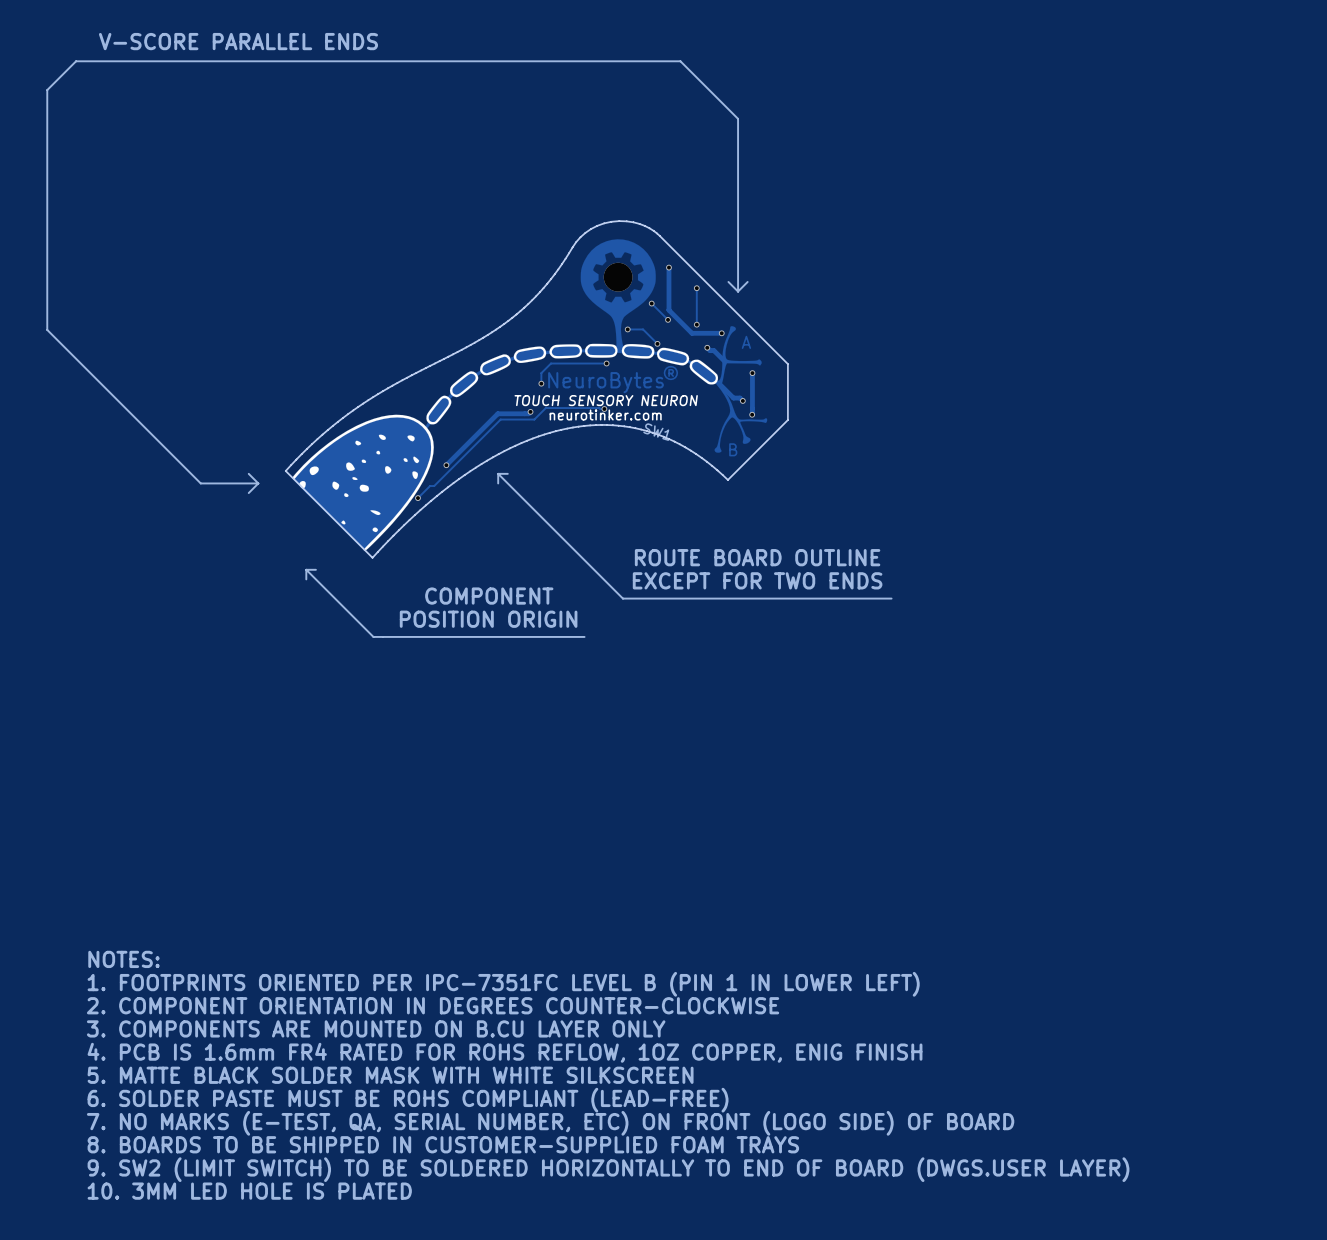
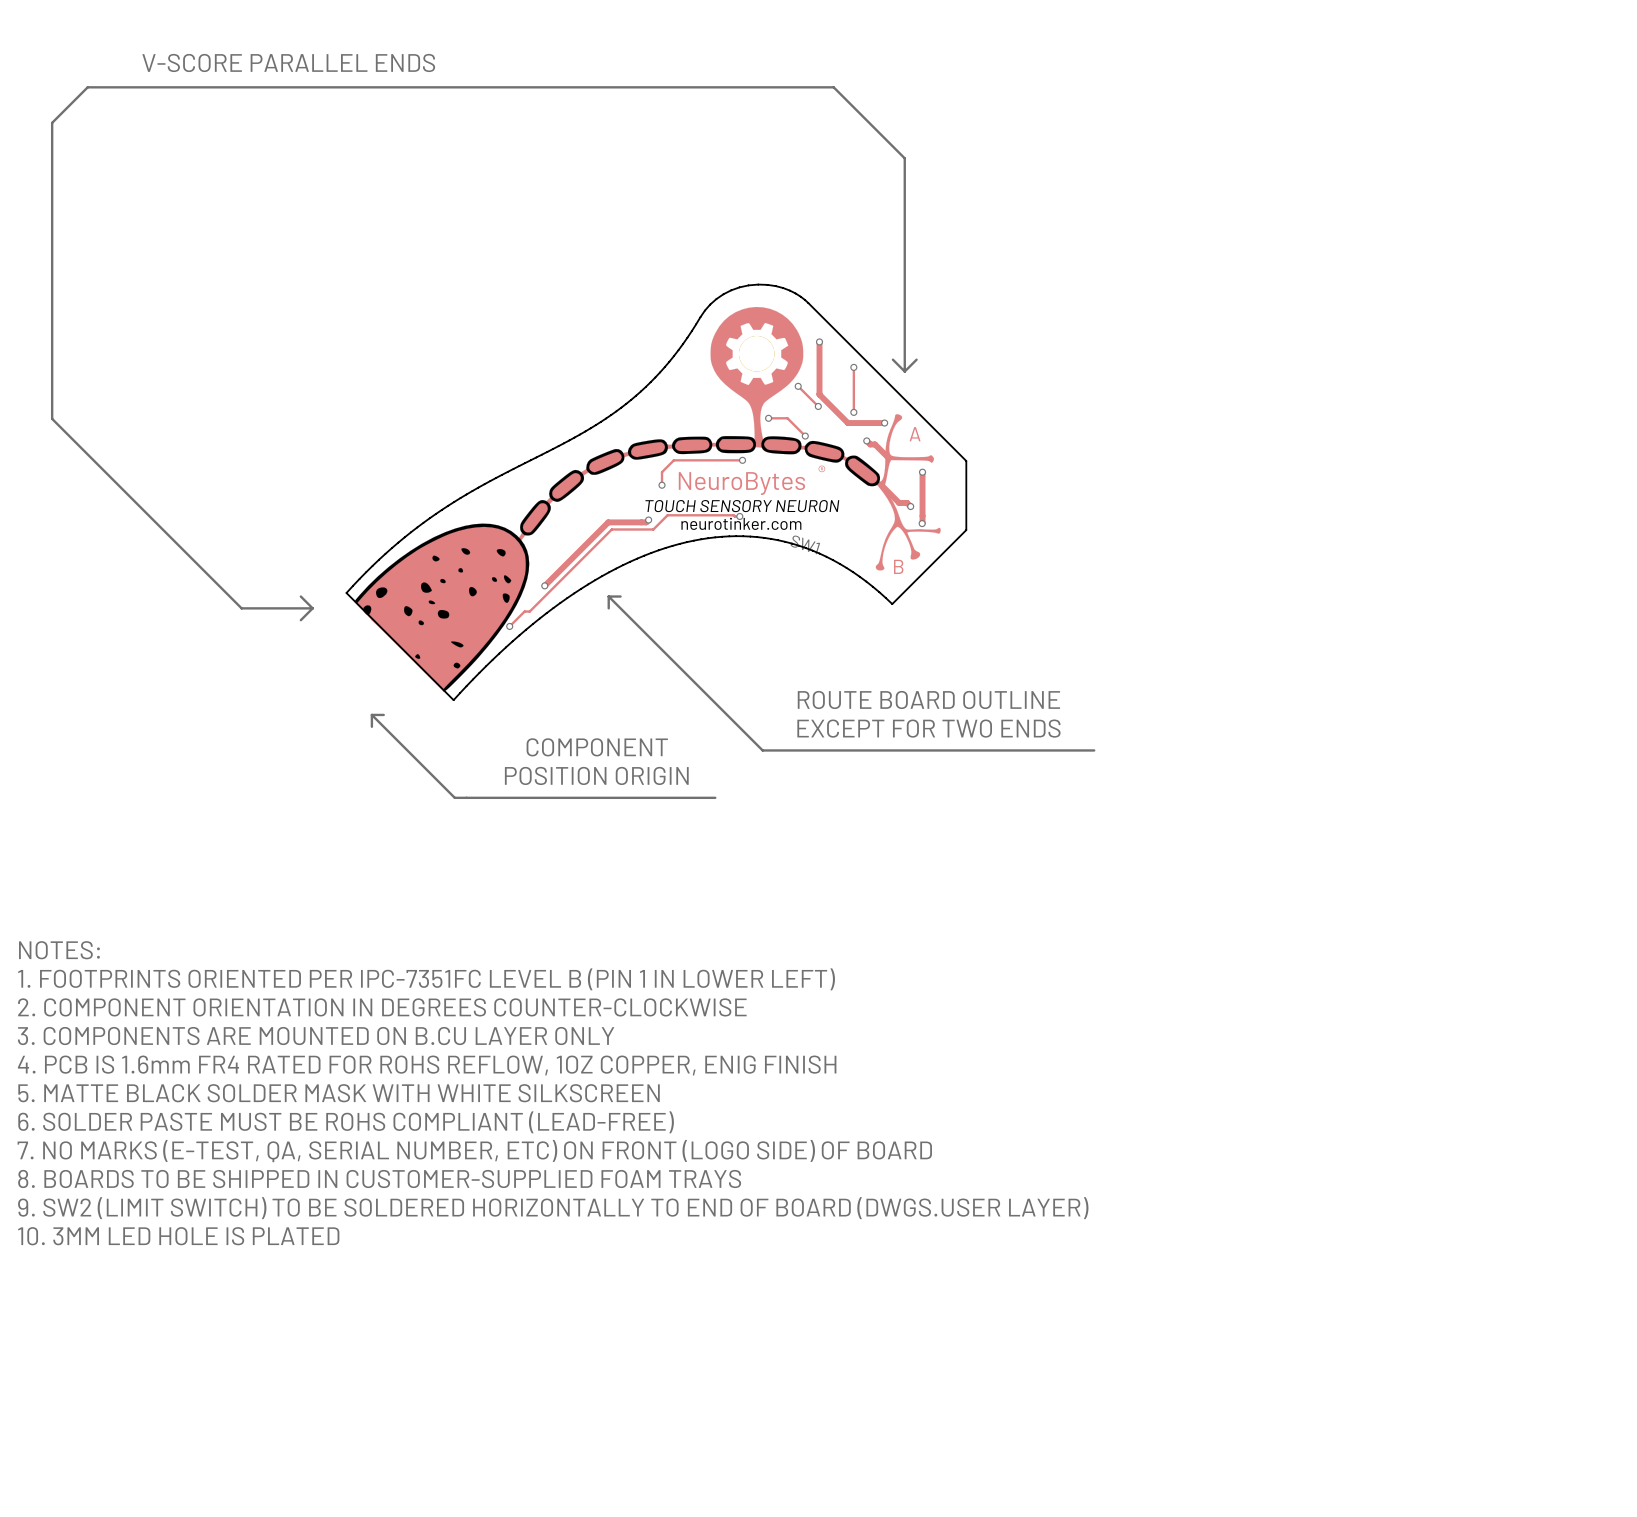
text position: NOTES: (123, 959) -> NOTES: (59, 950)
text position: 1. FOOTPRINTS ORIENTED PER IPC-7351FC LEVEL B (PIN 1 IN LOWER LEFT) (503, 984) -> 1. FOOTPRINTS ORIENTED PER IPC-7351FC LEVEL B (PIN 1 IN LOWER LEFT) (426, 979)
text position: 2. COMPONENT ORIENTATION IN DEGREES COUNTER-CLOCKWISE (433, 1005) -> 2. COMPONENT ORIENTATION IN DEGREES COUNTER-CLOCKWISE (382, 1007)
text position: 3. COMPONENTS ARE MOUNTED ON B.CU LAYER ONLY (376, 1028) -> 3. COMPONENTS ARE MOUNTED ON B.CU LAYER ONLY (316, 1036)
text position: 4. PCB IS 1.6mm FR4 RATED FOR ROHS REFLOW, 1OZ COPPER, ENIG FINISH (505, 1052) -> 4. PCB IS 1.6mm FR4 RATED FOR ROHS REFLOW, 1OZ COPPER, ENIG FINISH (427, 1065)
text position: 5. MATTE BLACK SOLDER MASK WITH WHITE SILKSCREEN (390, 1075) -> 5. MATTE BLACK SOLDER MASK WITH WHITE SILKSCREEN (339, 1093)
text position: 6. SOLDER PASTE MUST BE ROHS COMPLIANT (LEAD-FREE) (408, 1100) -> 6. SOLDER PASTE MUST BE ROHS COMPLIANT (LEAD-FREE) (346, 1122)
text position: 7. NO MARKS (E-TEST, QA, SERIAL NUMBER, ETC) ON FRONT (LOGO SIDE) OF BOARD (550, 1123) -> 7. NO MARKS (E-TEST, QA, SERIAL NUMBER, ETC) ON FRONT (LOGO SIDE) OF BOARD (474, 1151)
text position: 8. BOARDS TO BE SHIPPED IN CUSTOMER-SUPPLIED FOAM TRAYS (443, 1144) -> 8. BOARDS TO BE SHIPPED IN CUSTOMER-SUPPLIED FOAM TRAYS (379, 1178)
text position: 9. SW2 (LIMIT SWITCH) TO BE SOLDERED HORIZONTALLY TO END OF BOARD (DWGS.USER LAYER) (608, 1169) -> 9. SW2 (LIMIT SWITCH) TO BE SOLDERED HORIZONTALLY TO END OF BOARD (DWGS.USER LAYER) (553, 1208)
text position: 10. 3MM LED HOLE IS PLATED (249, 1191) -> 10. 3MM LED HOLE IS PLATED (178, 1236)

